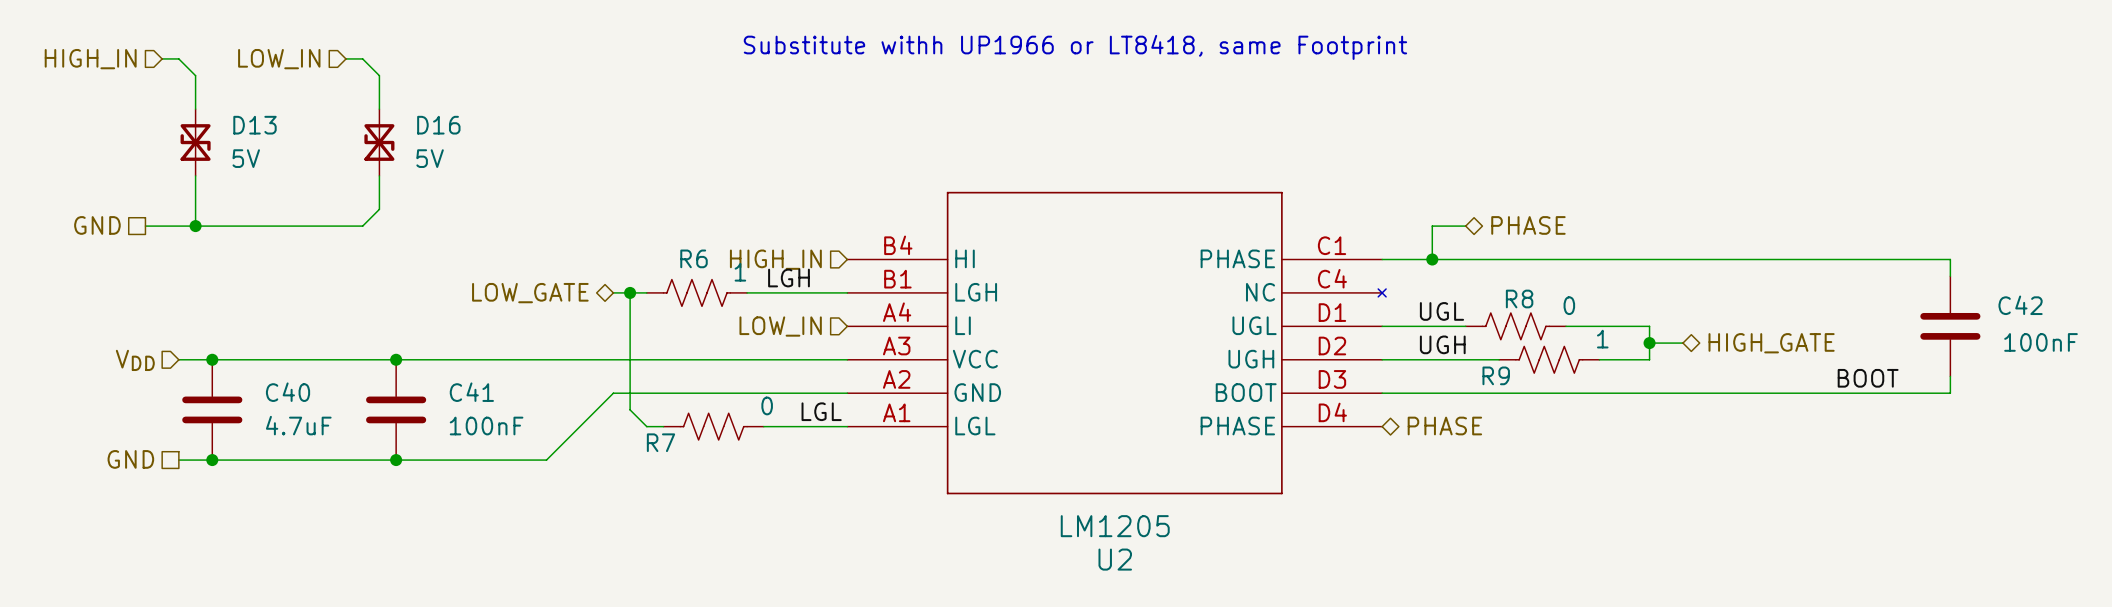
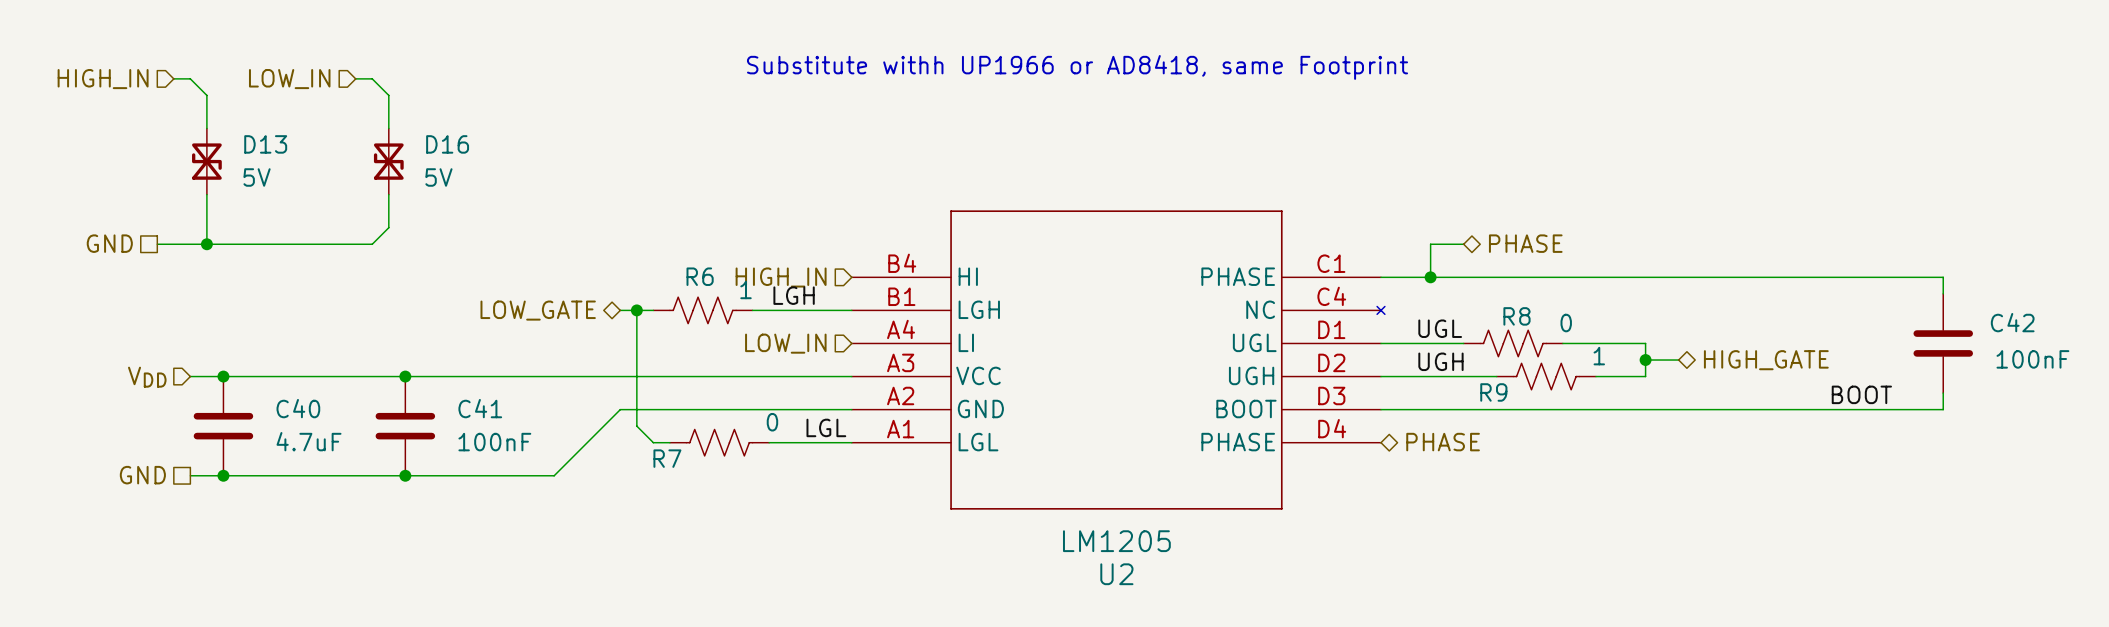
text: Substitute withh UP1966 or LT8418, same Footprint (1075, 47) -> Substitute withh UP1966 or AD8418, same Footprint (1077, 67)

